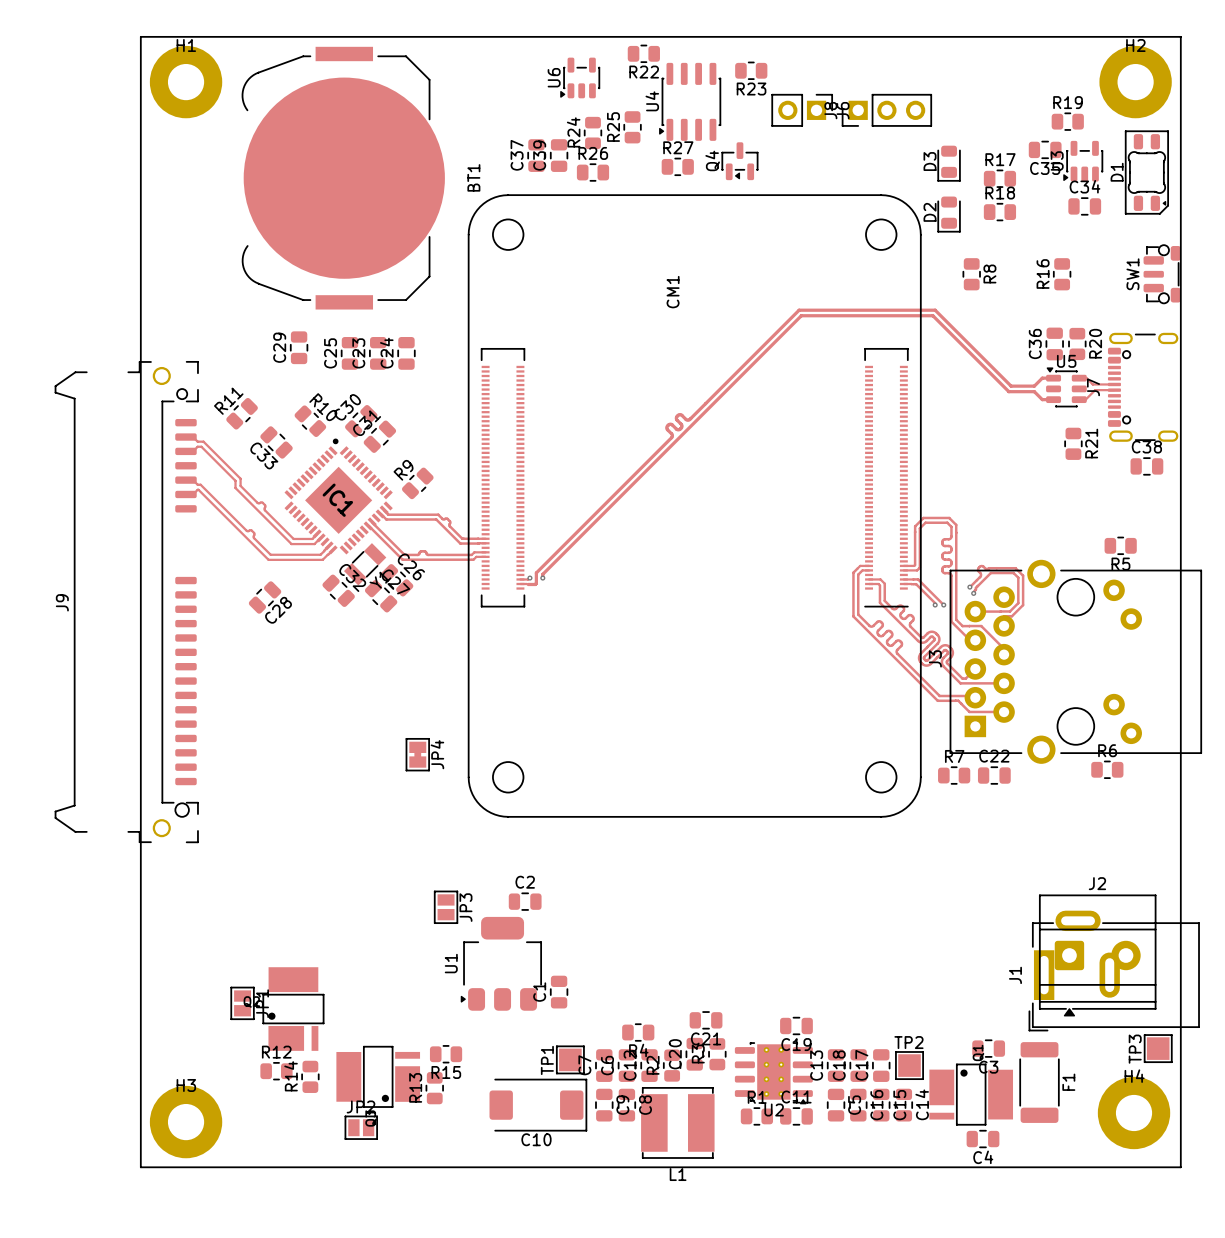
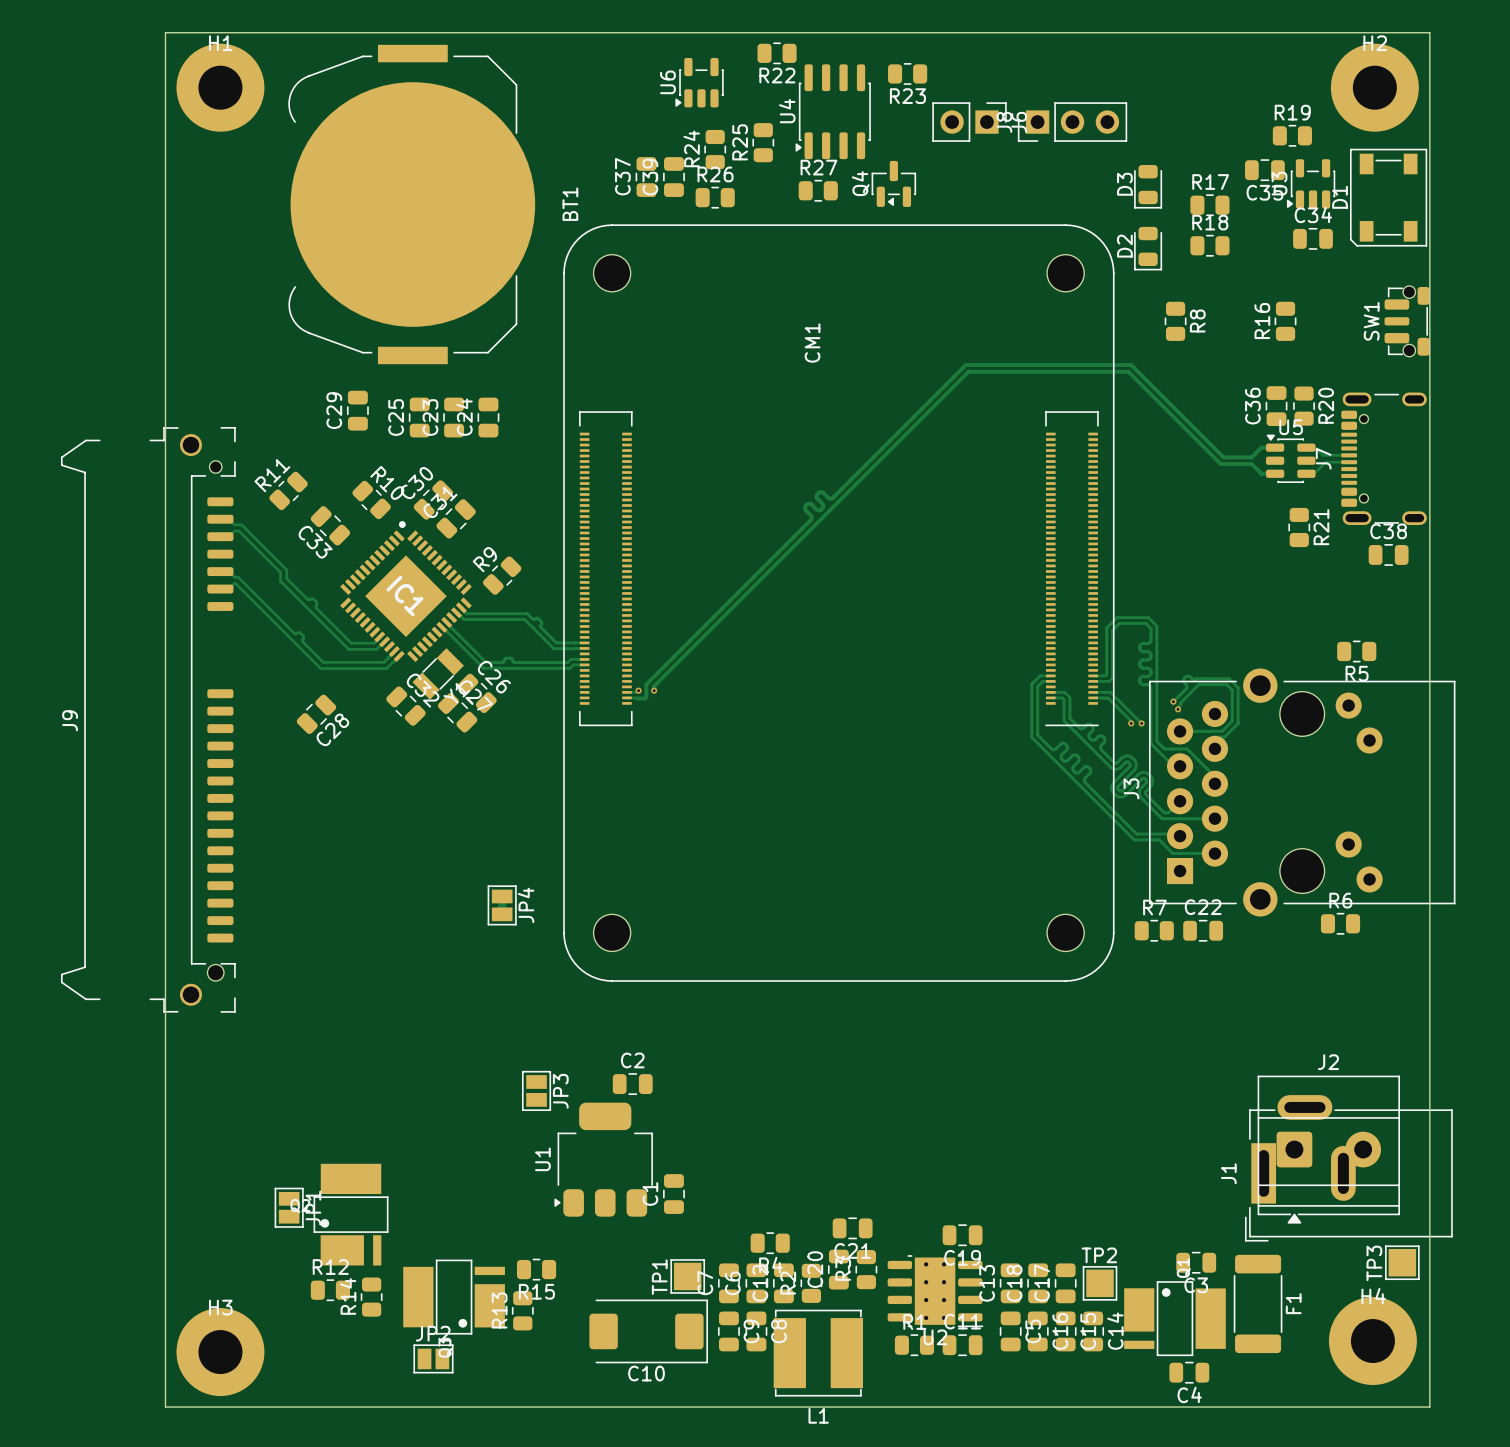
D1 footprint: [1125, 130, 1169, 215] -> [1349, 148, 1428, 247]
U2 footprint: [734, 1042, 813, 1105] -> [887, 1255, 984, 1328]

